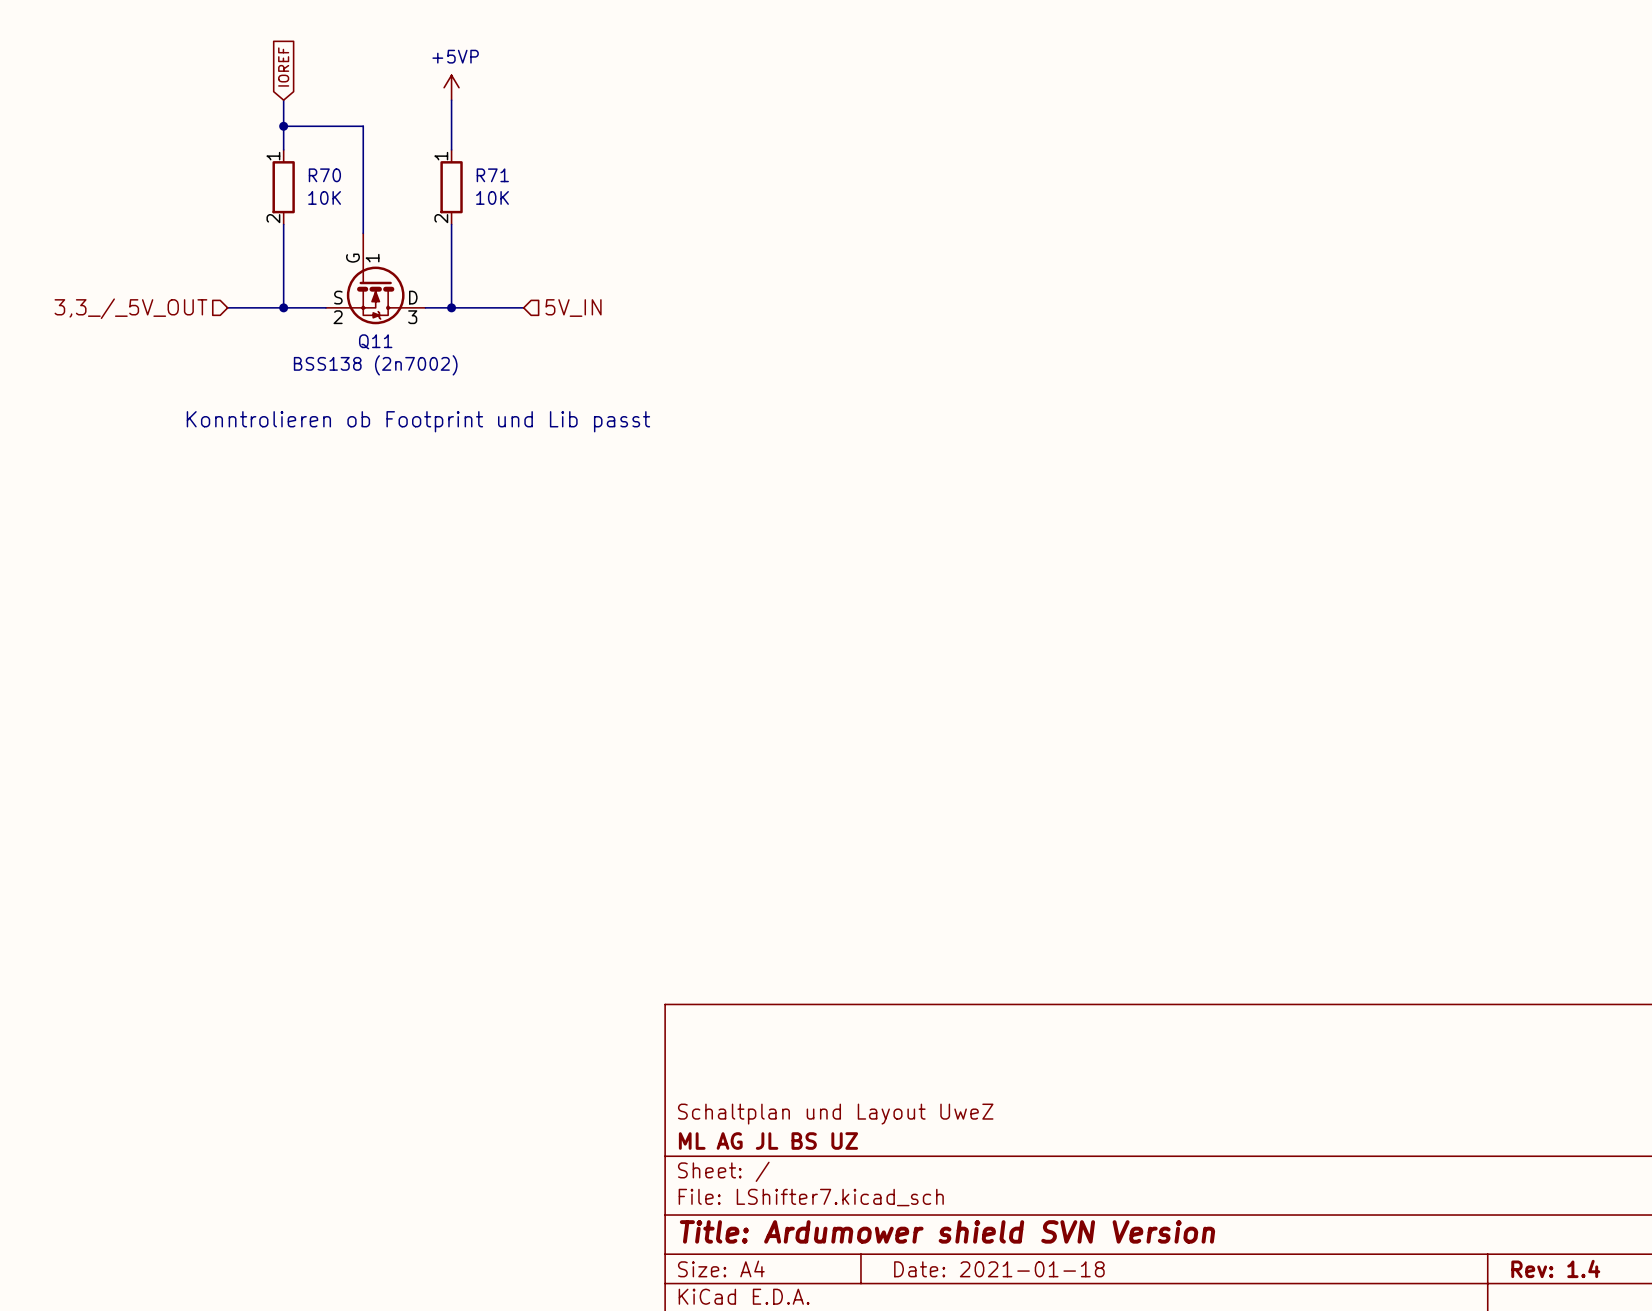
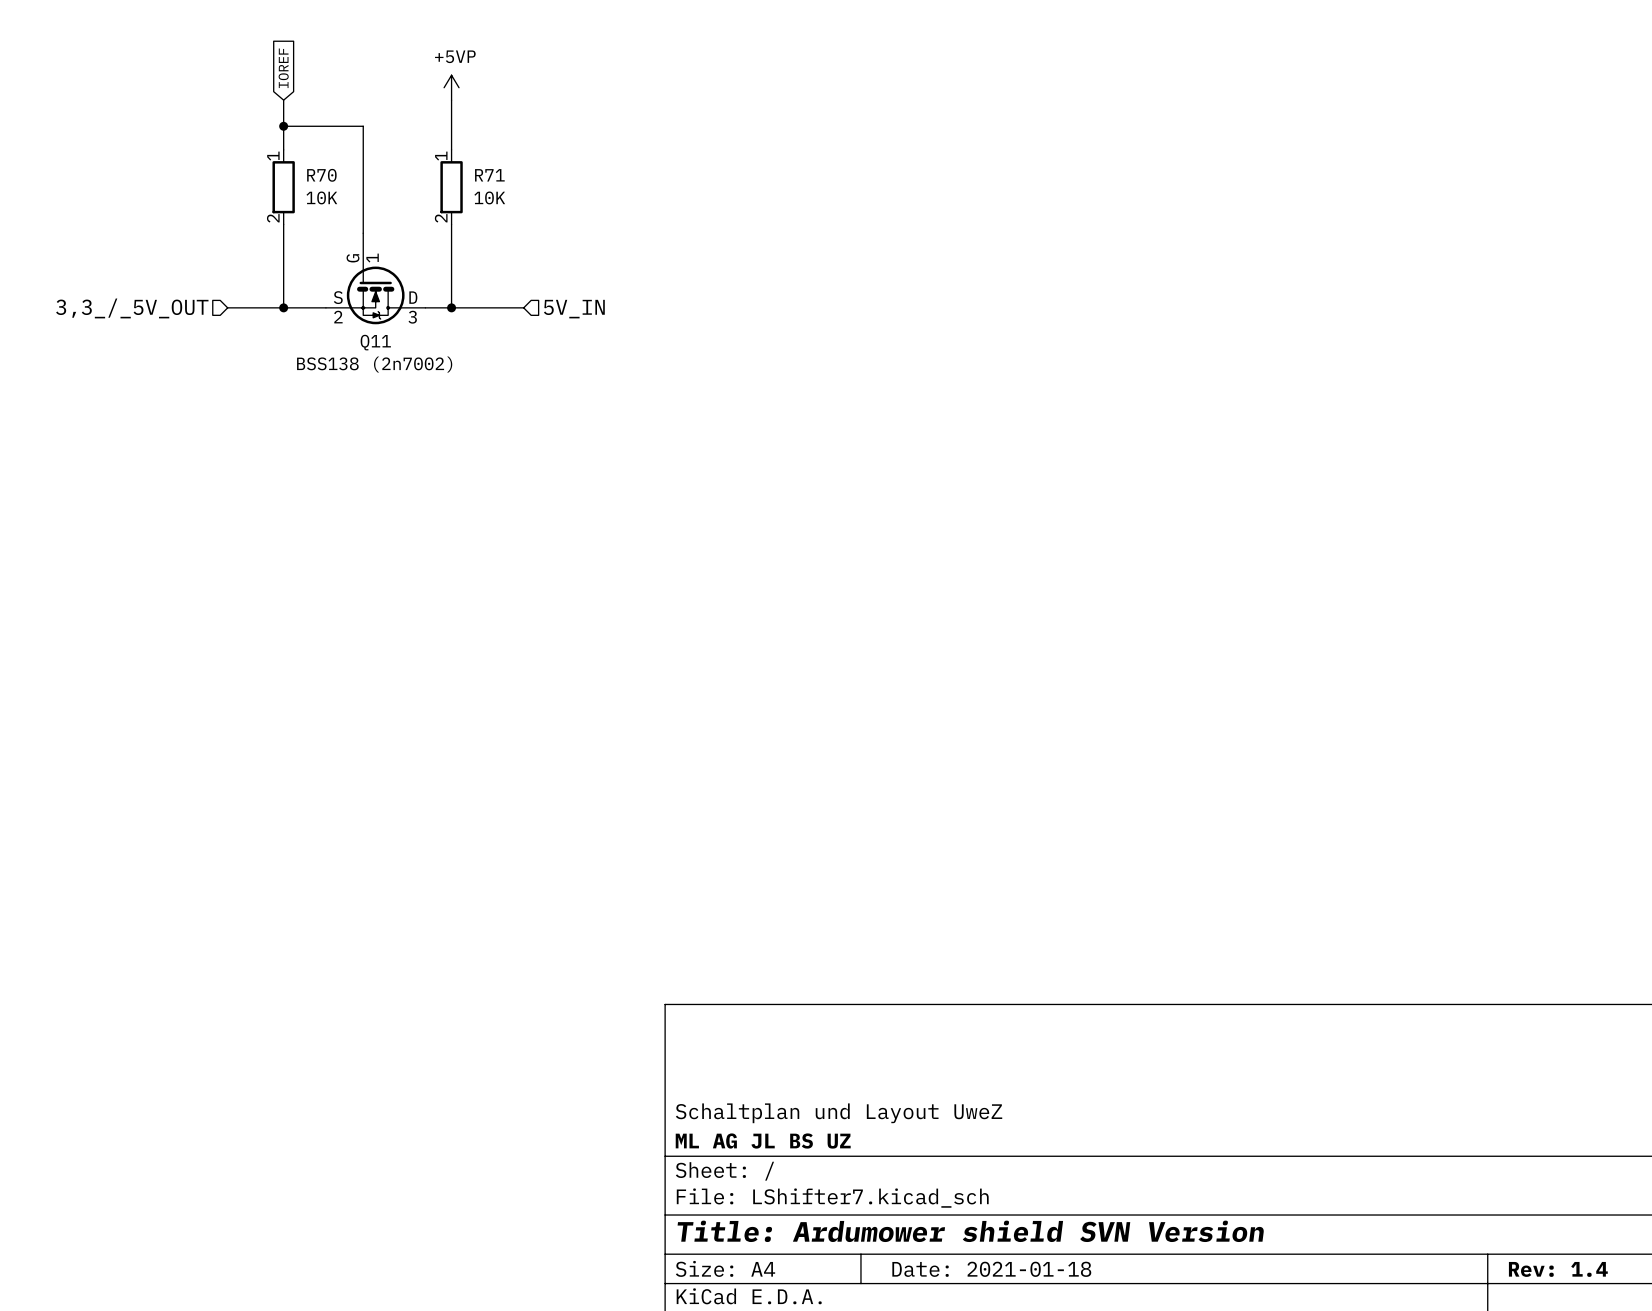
text: Konntrolieren ob Footprint und Lib passt (418, 421) -> none

